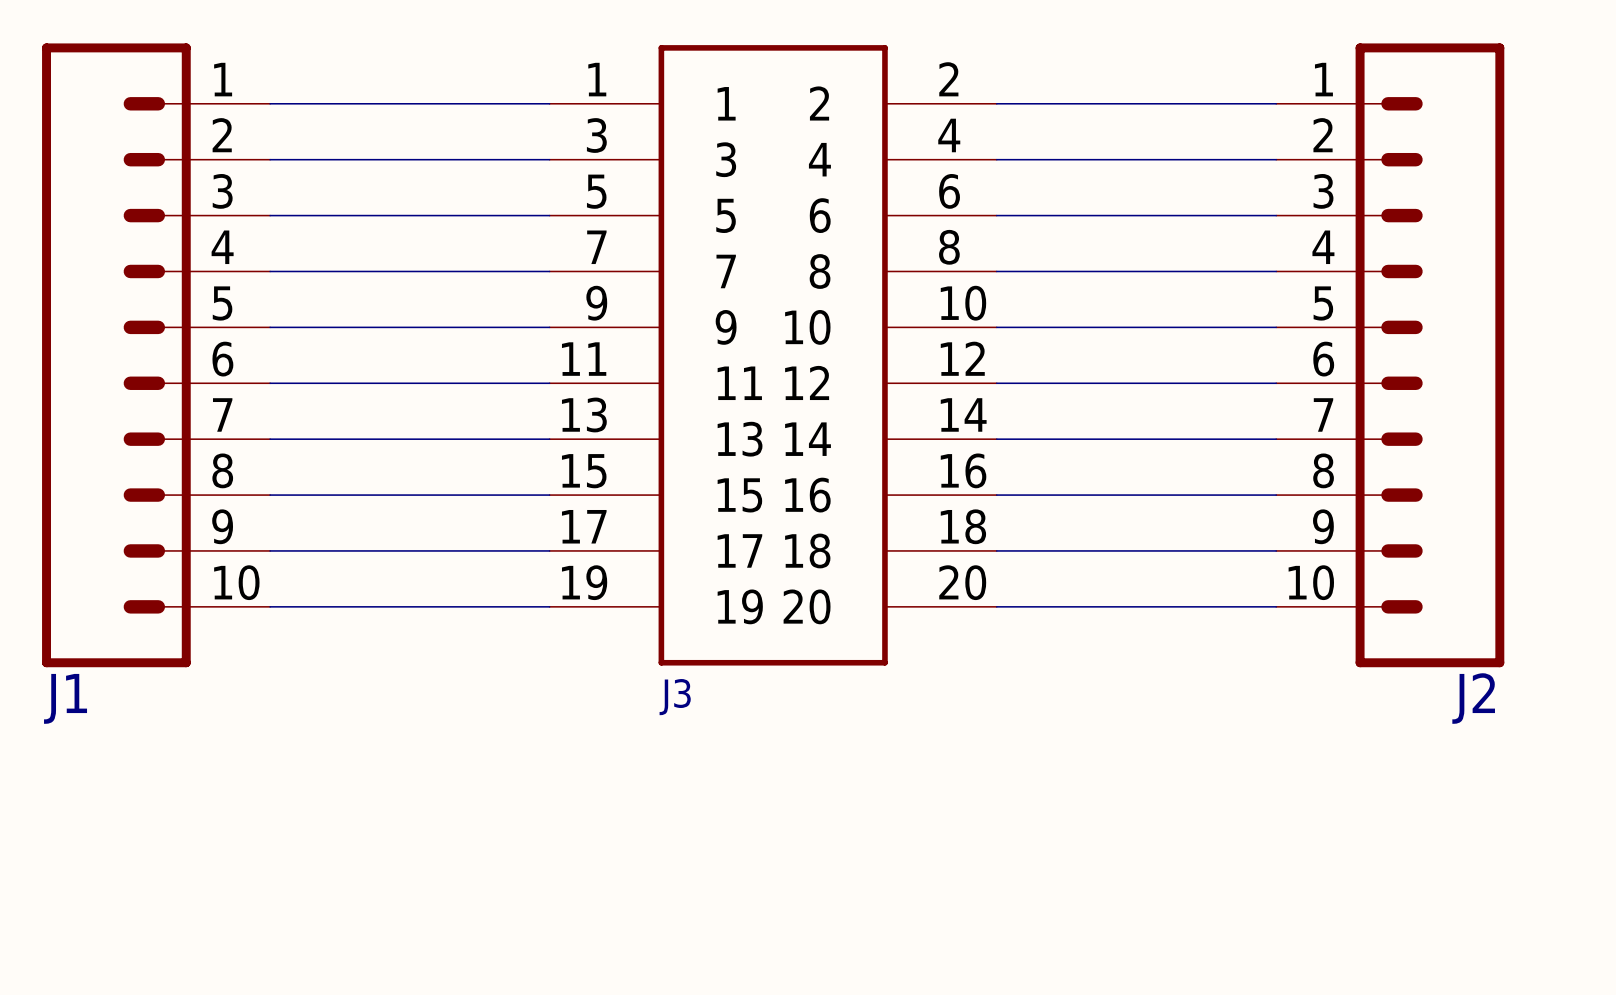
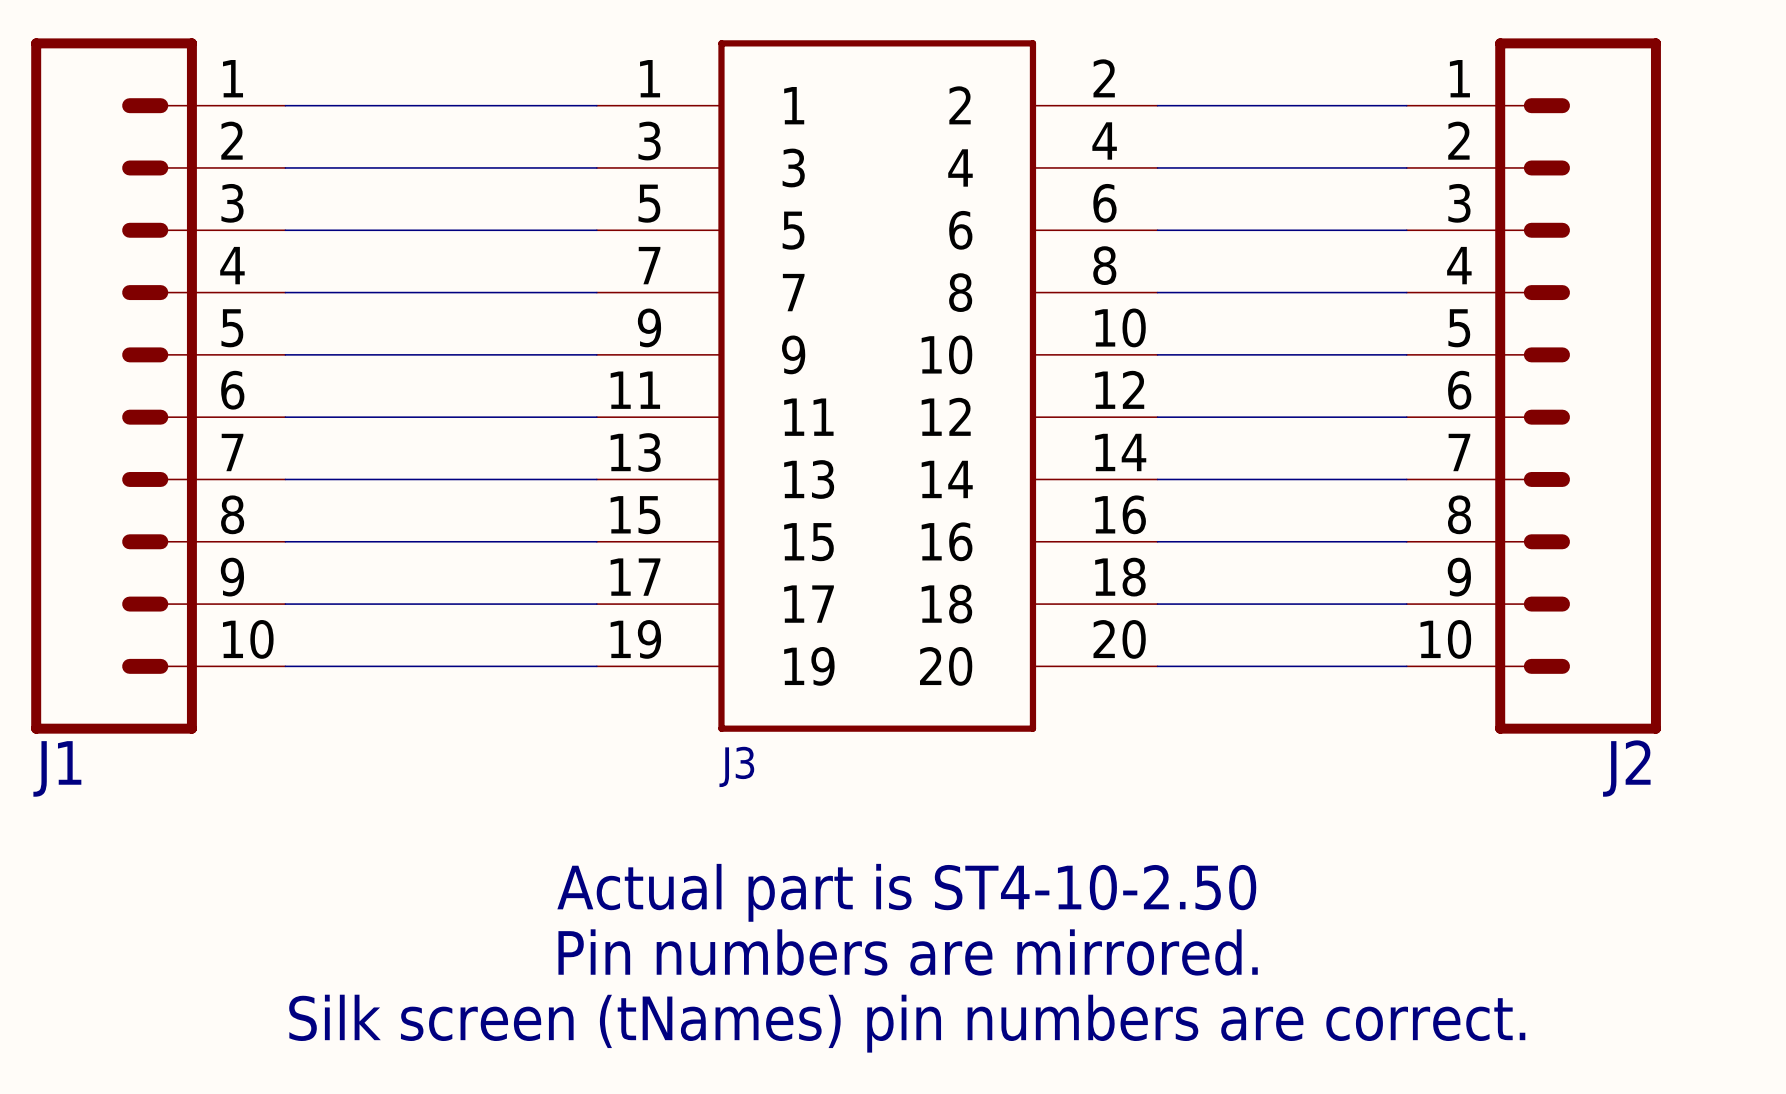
J3 symbol: [549, 45, 997, 666] -> [596, 40, 1158, 732]
text: none -> Actual part is ST4-10-2.50 (906, 892)
text: none -> Pin numbers are mirrored. (908, 952)
text: none -> Silk screen (tNames) pin numbers are correct. (907, 1023)

